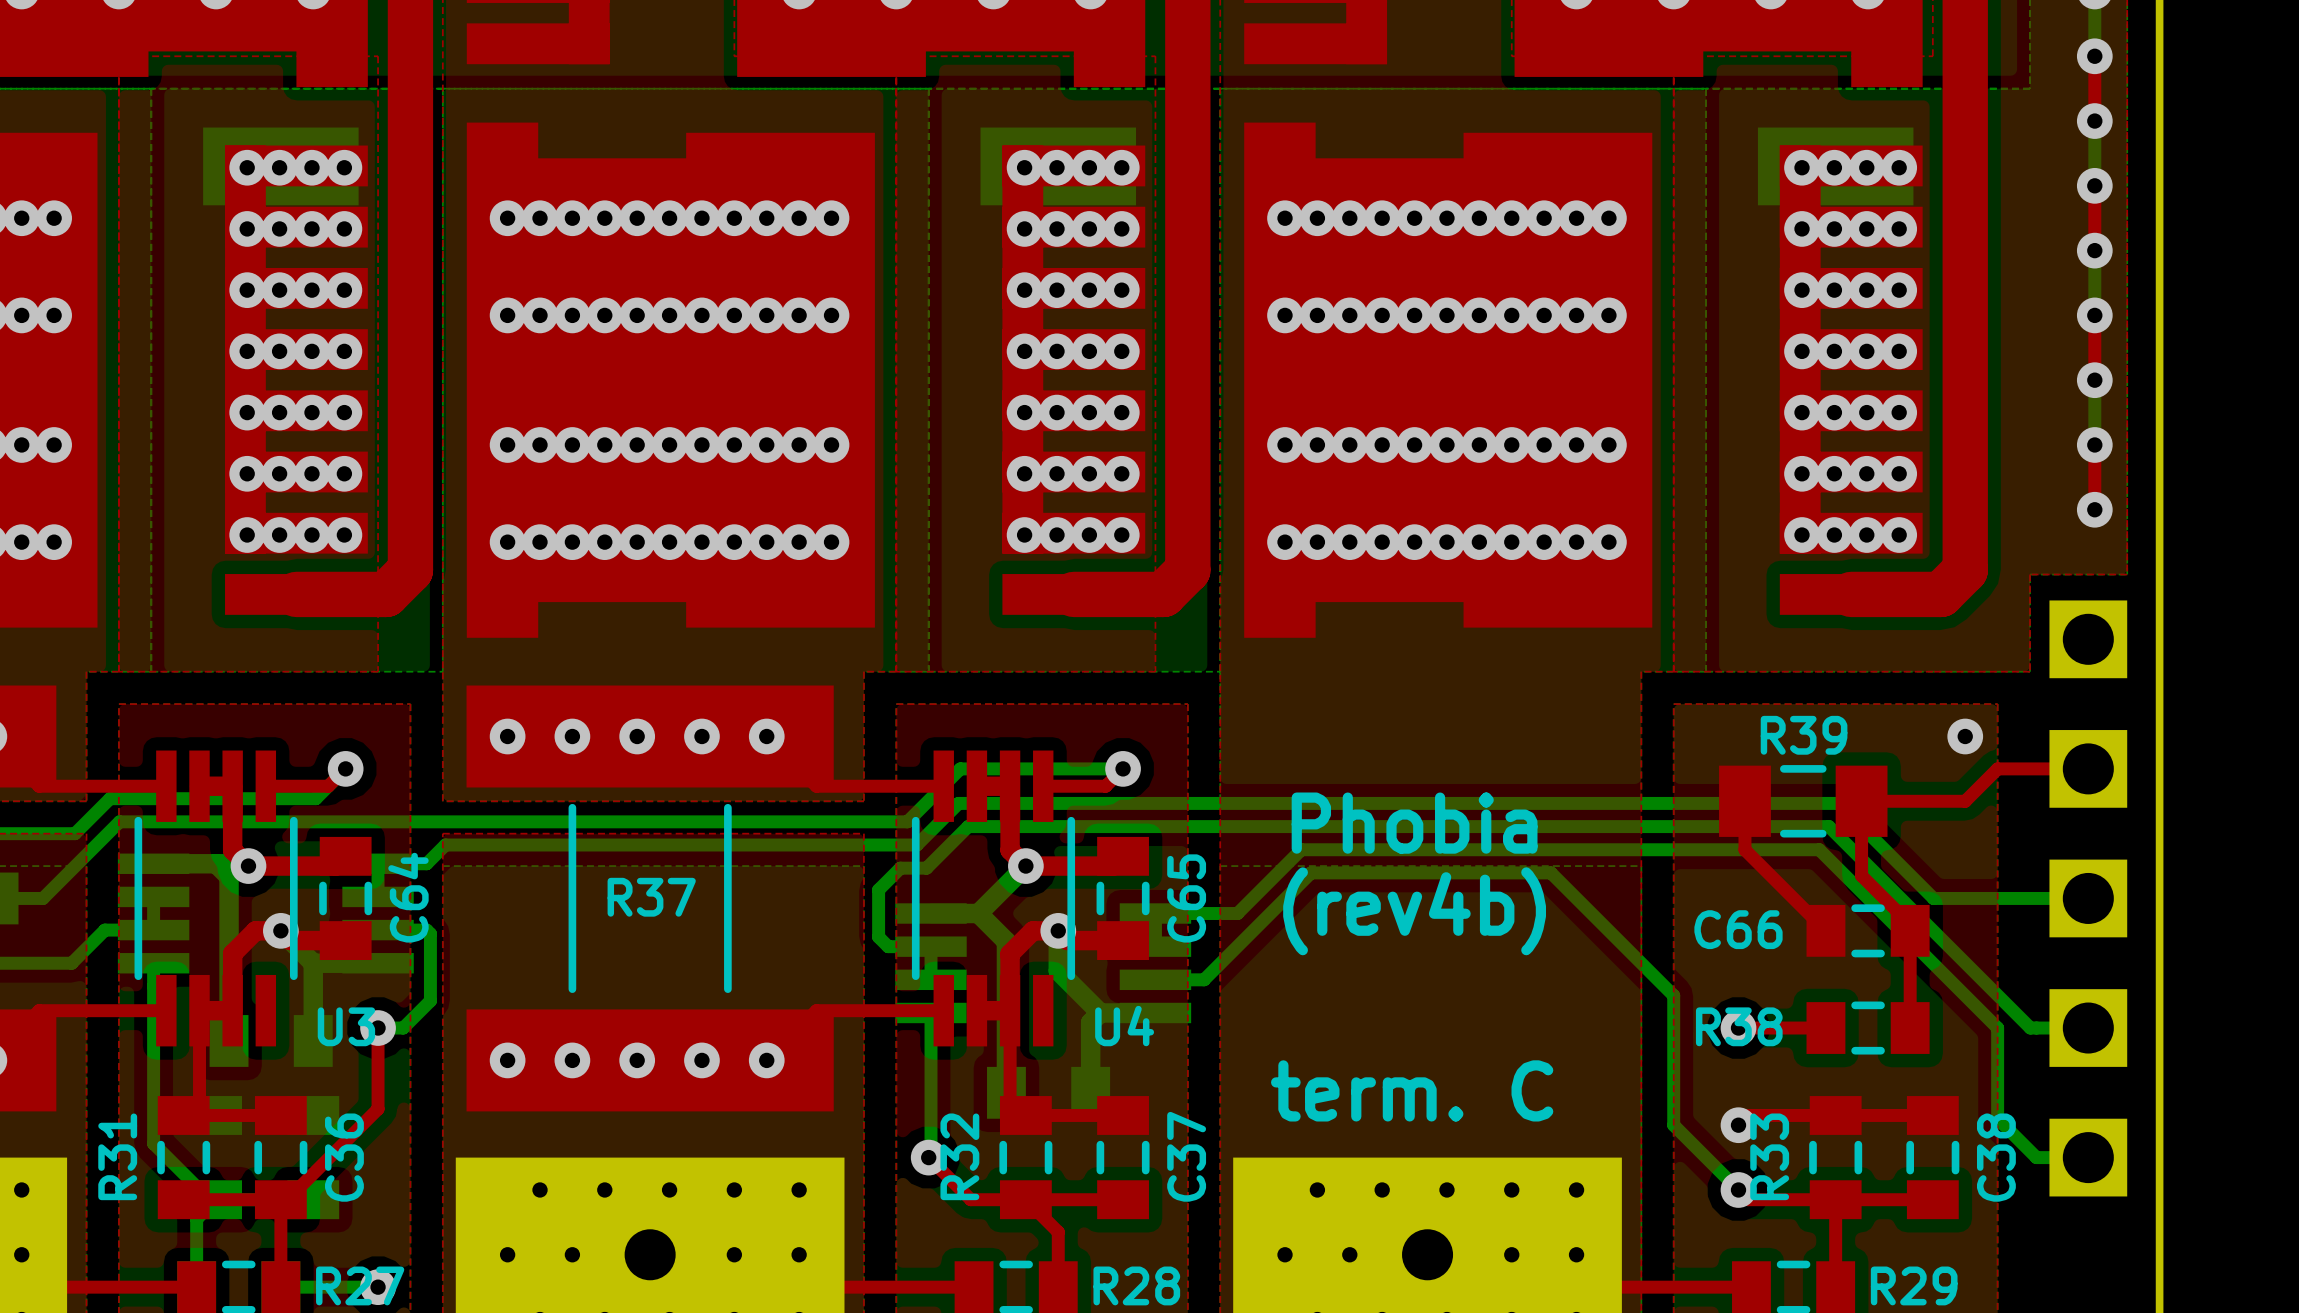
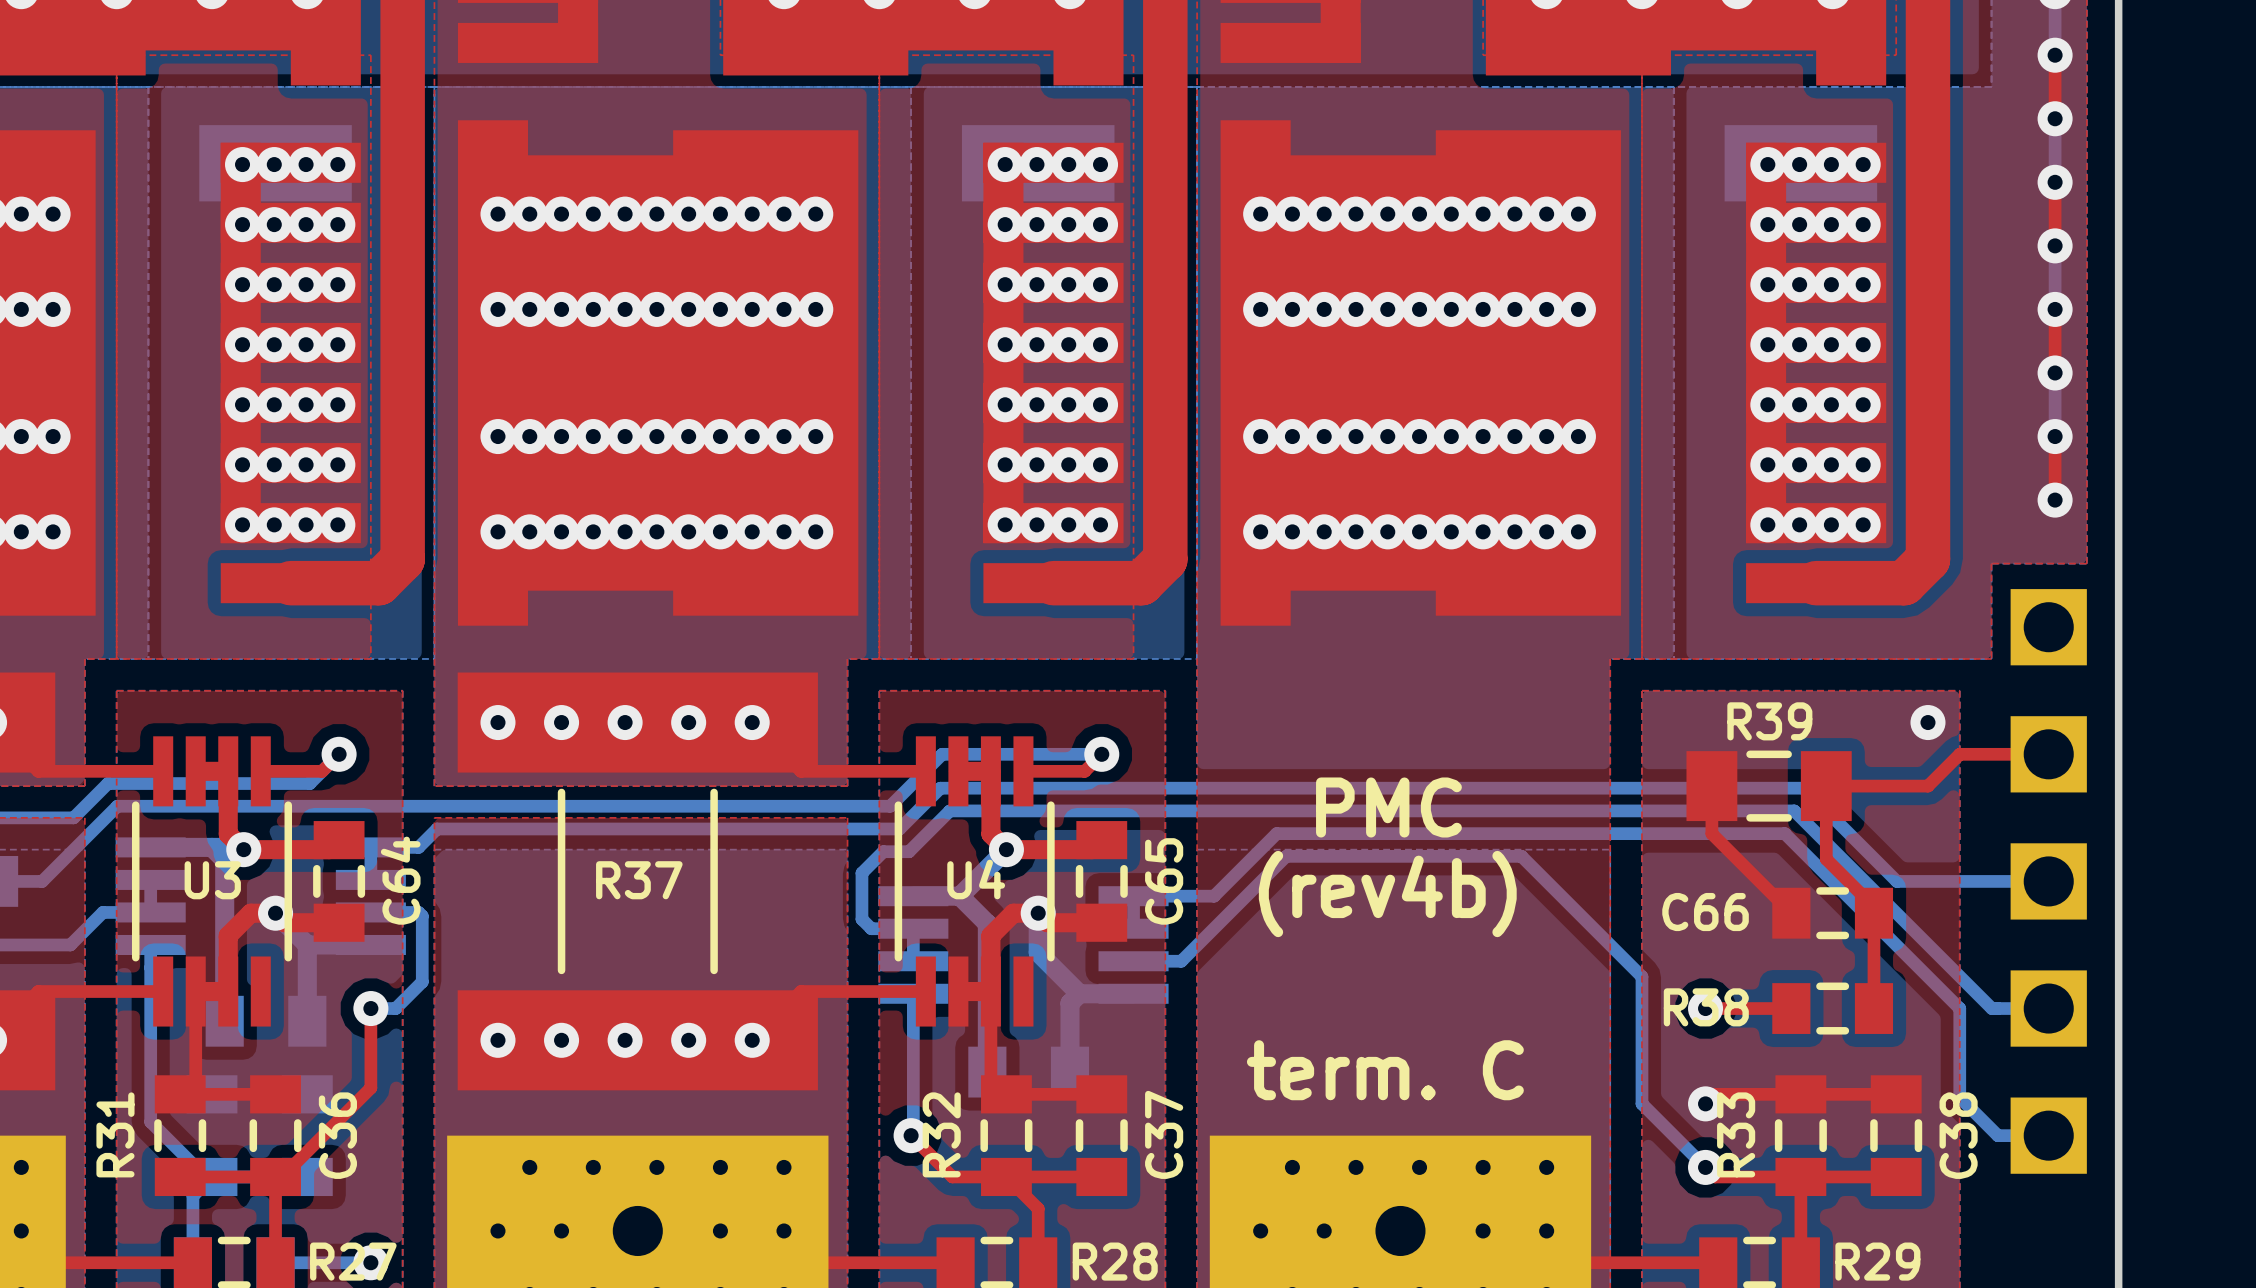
text: Phobia (1414, 823) -> PMC (1388, 807)
U3 name position: U3 (346, 1026) -> U3 (212, 880)
U4 name position: U4 (1124, 1026) -> U4 (976, 879)

